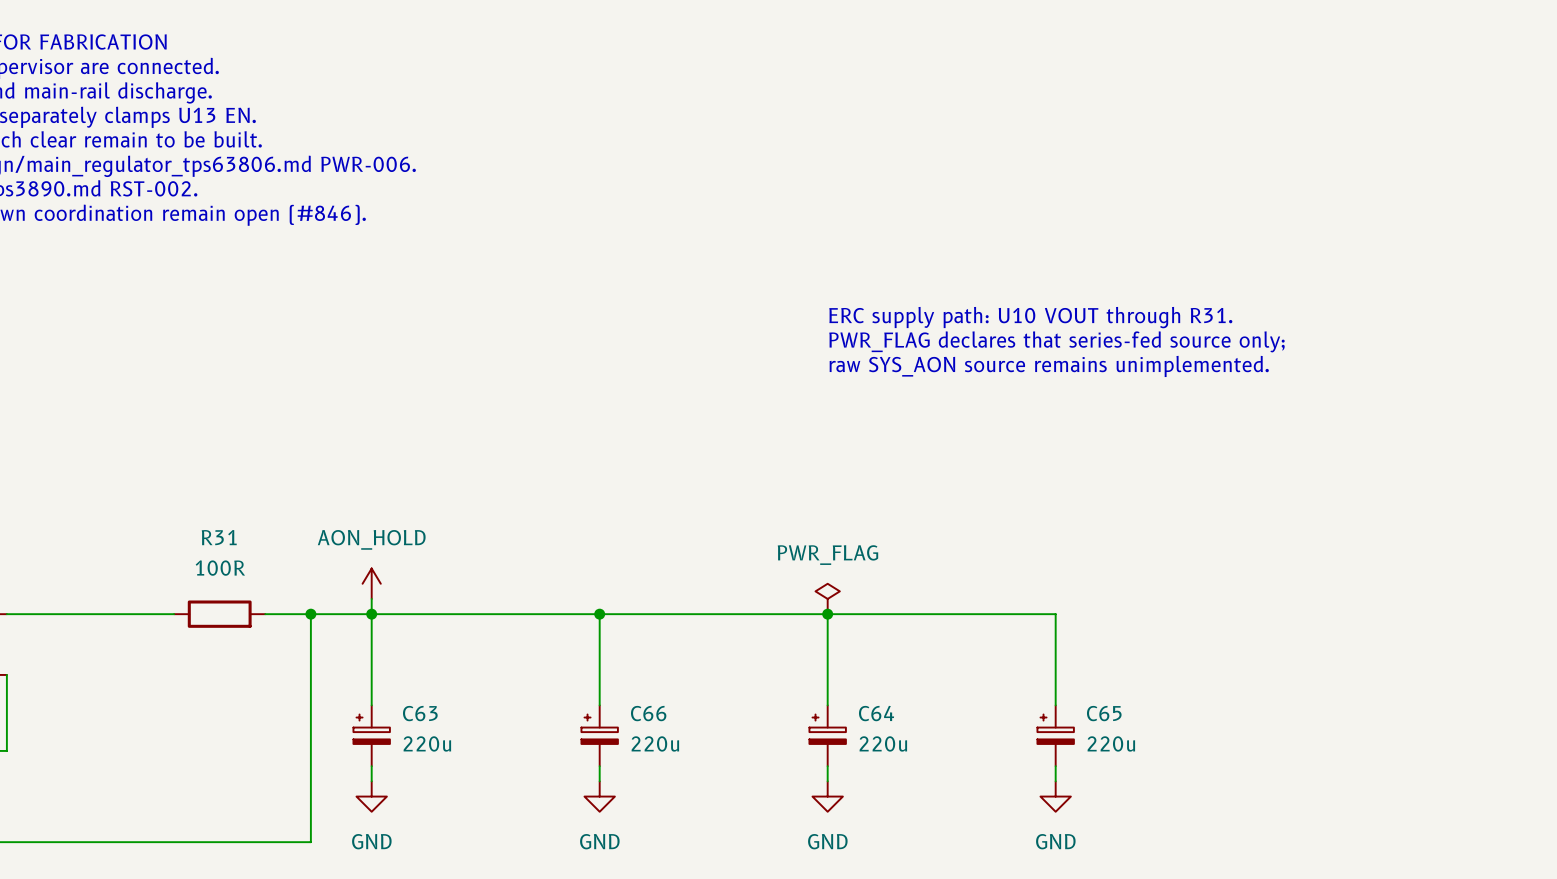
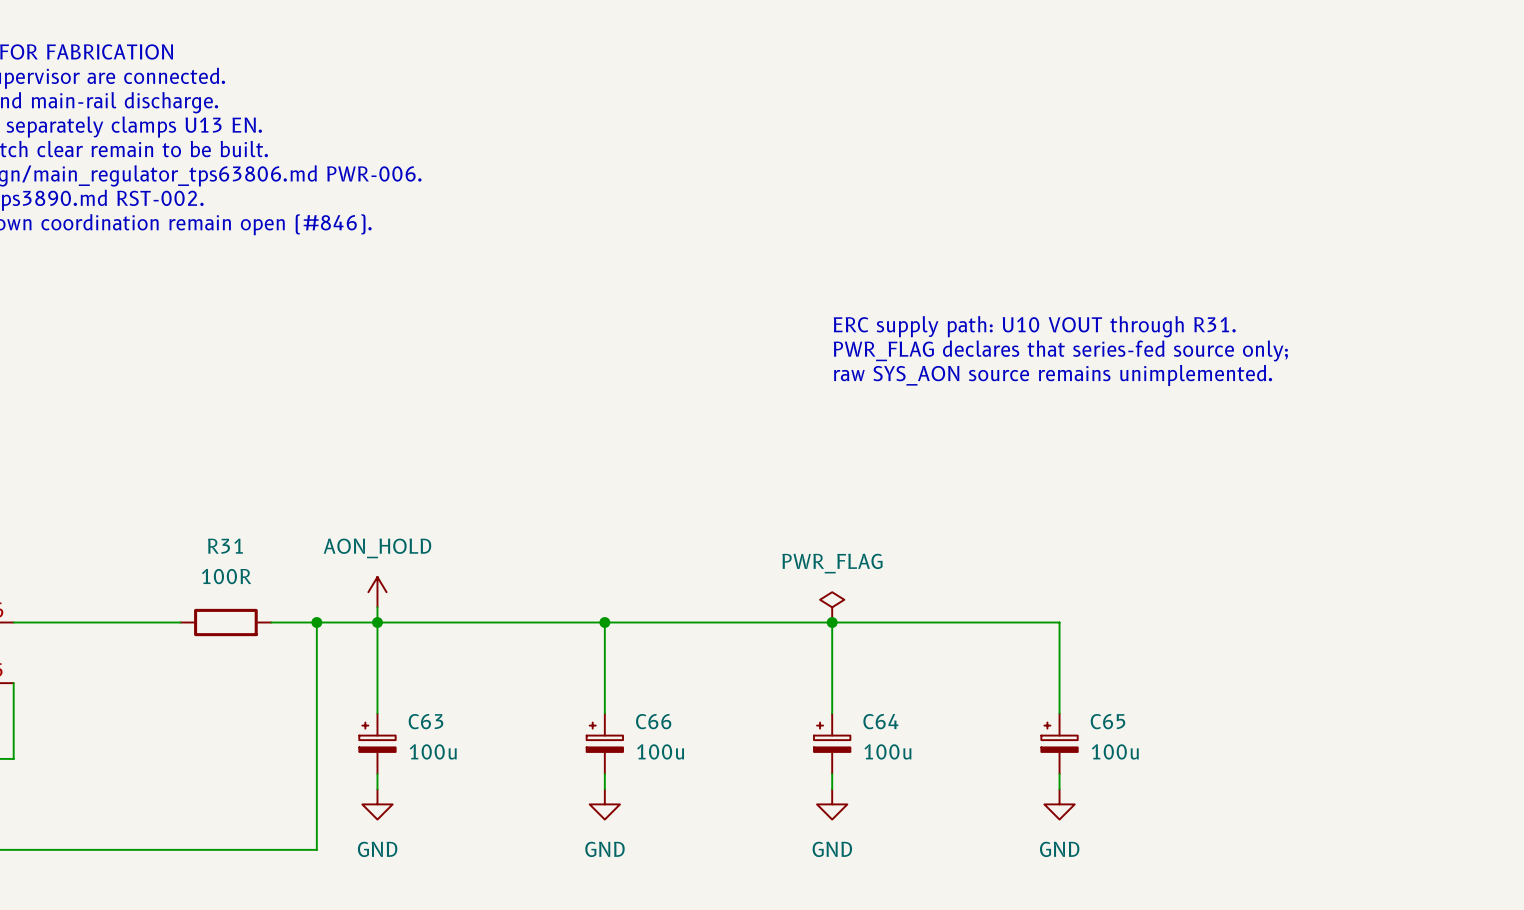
C63 value: 220u (427, 743) -> 100u (433, 751)
C66 value: 220u (655, 743) -> 100u (660, 751)
C64 value: 220u (883, 743) -> 100u (887, 751)
C65 value: 220u (1111, 743) -> 100u (1115, 751)

